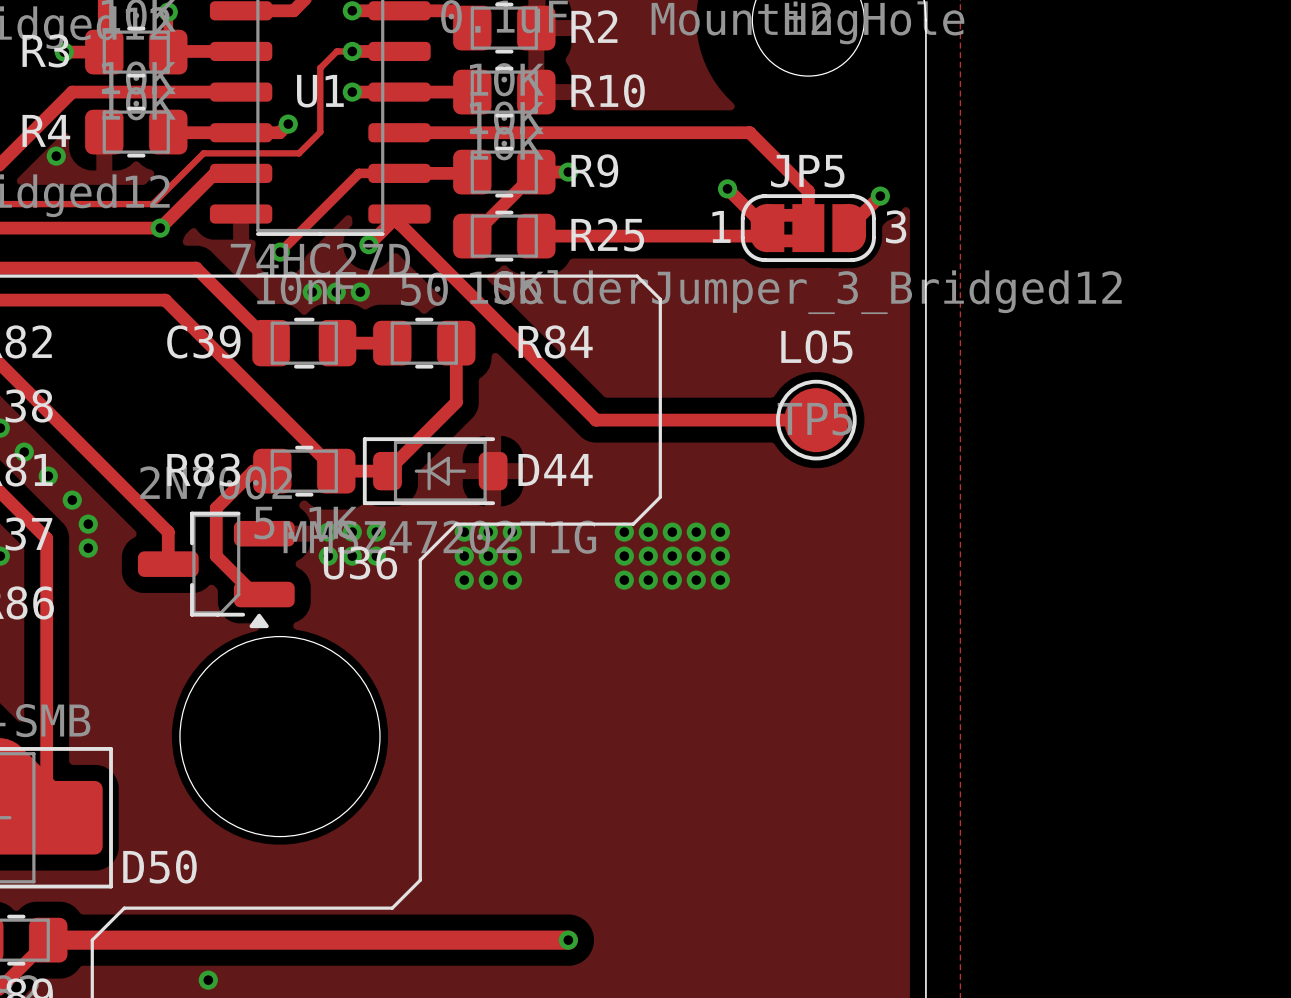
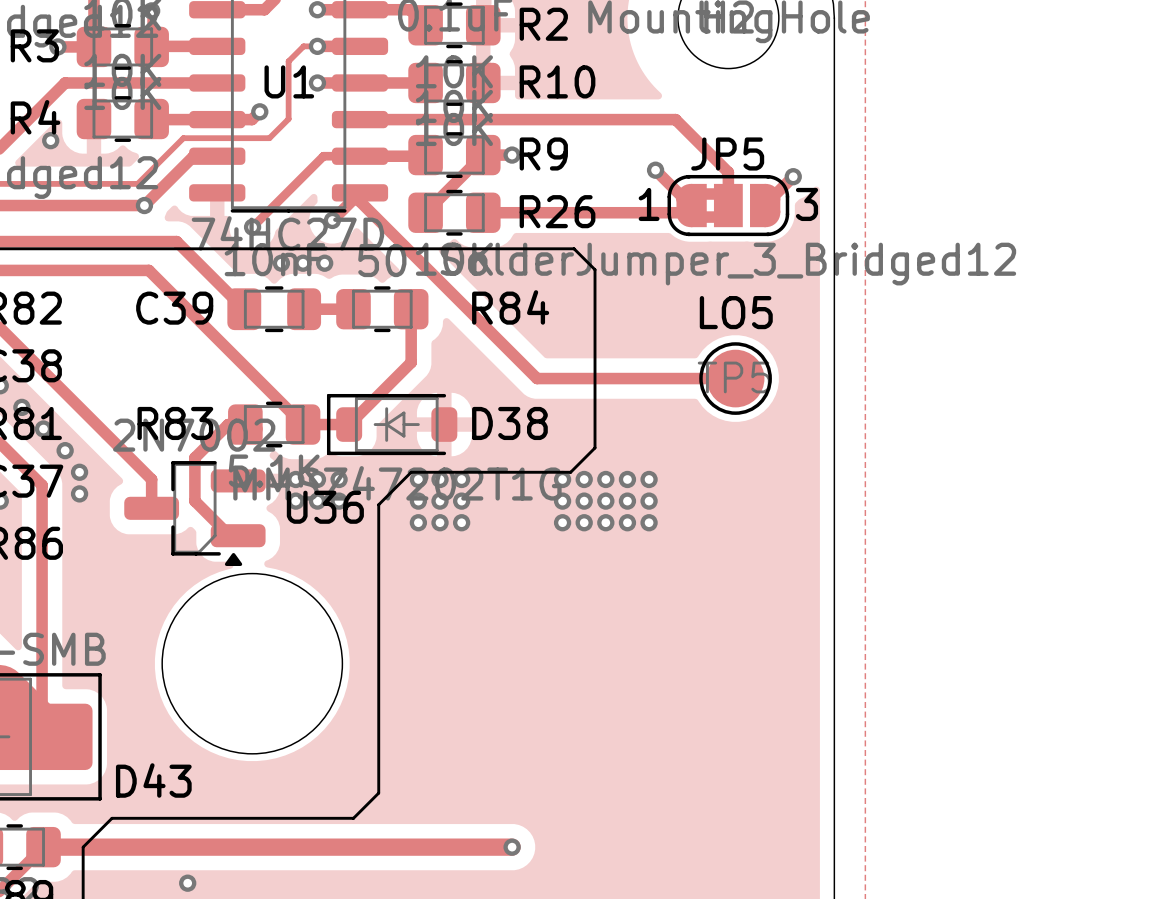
R25 name: R25 (607, 234) -> R26 (557, 211)
D44 name: D44 (555, 469) -> D38 (509, 423)
D50 name: D50 (159, 866) -> D43 (153, 780)

